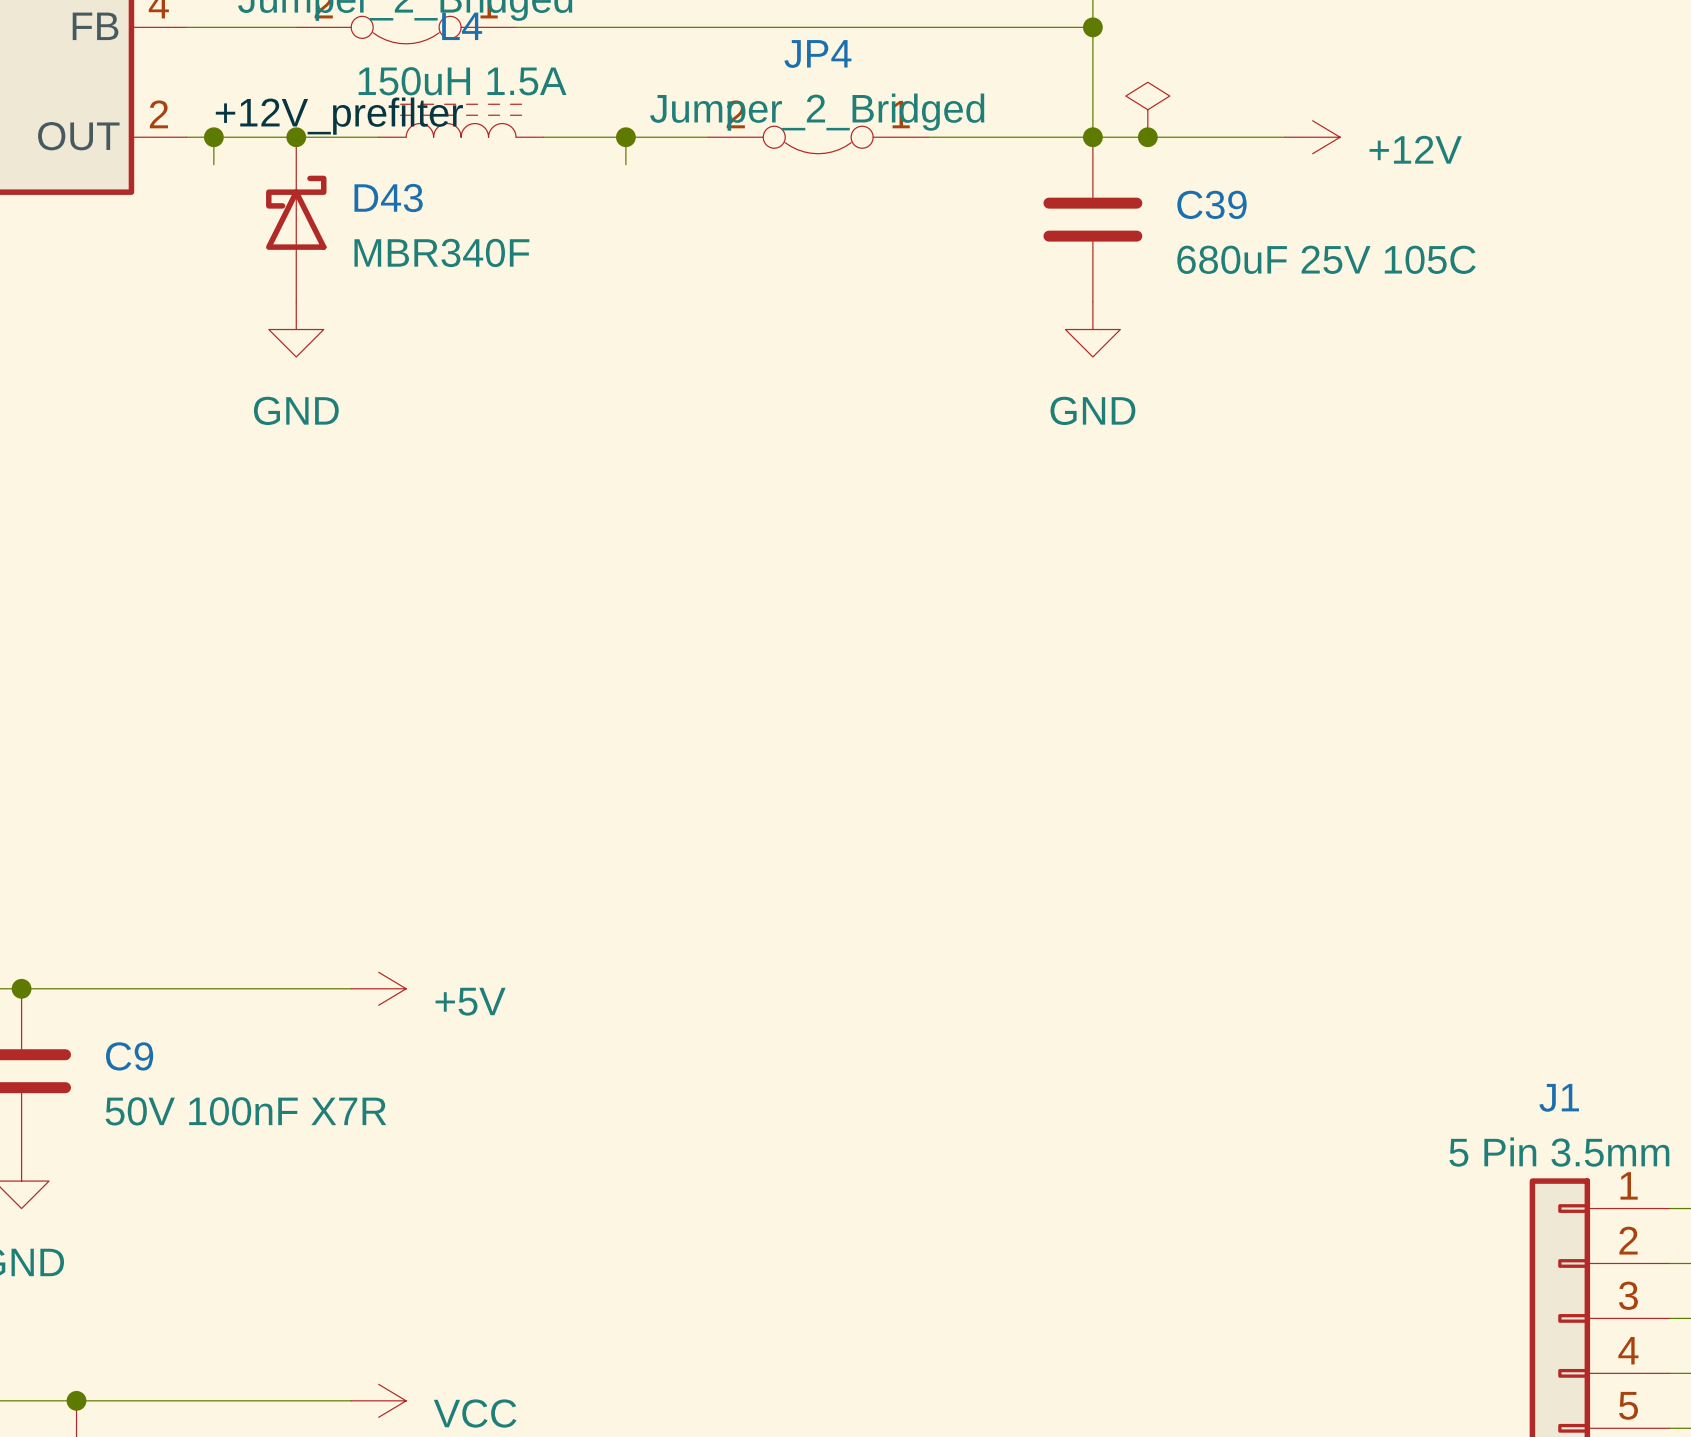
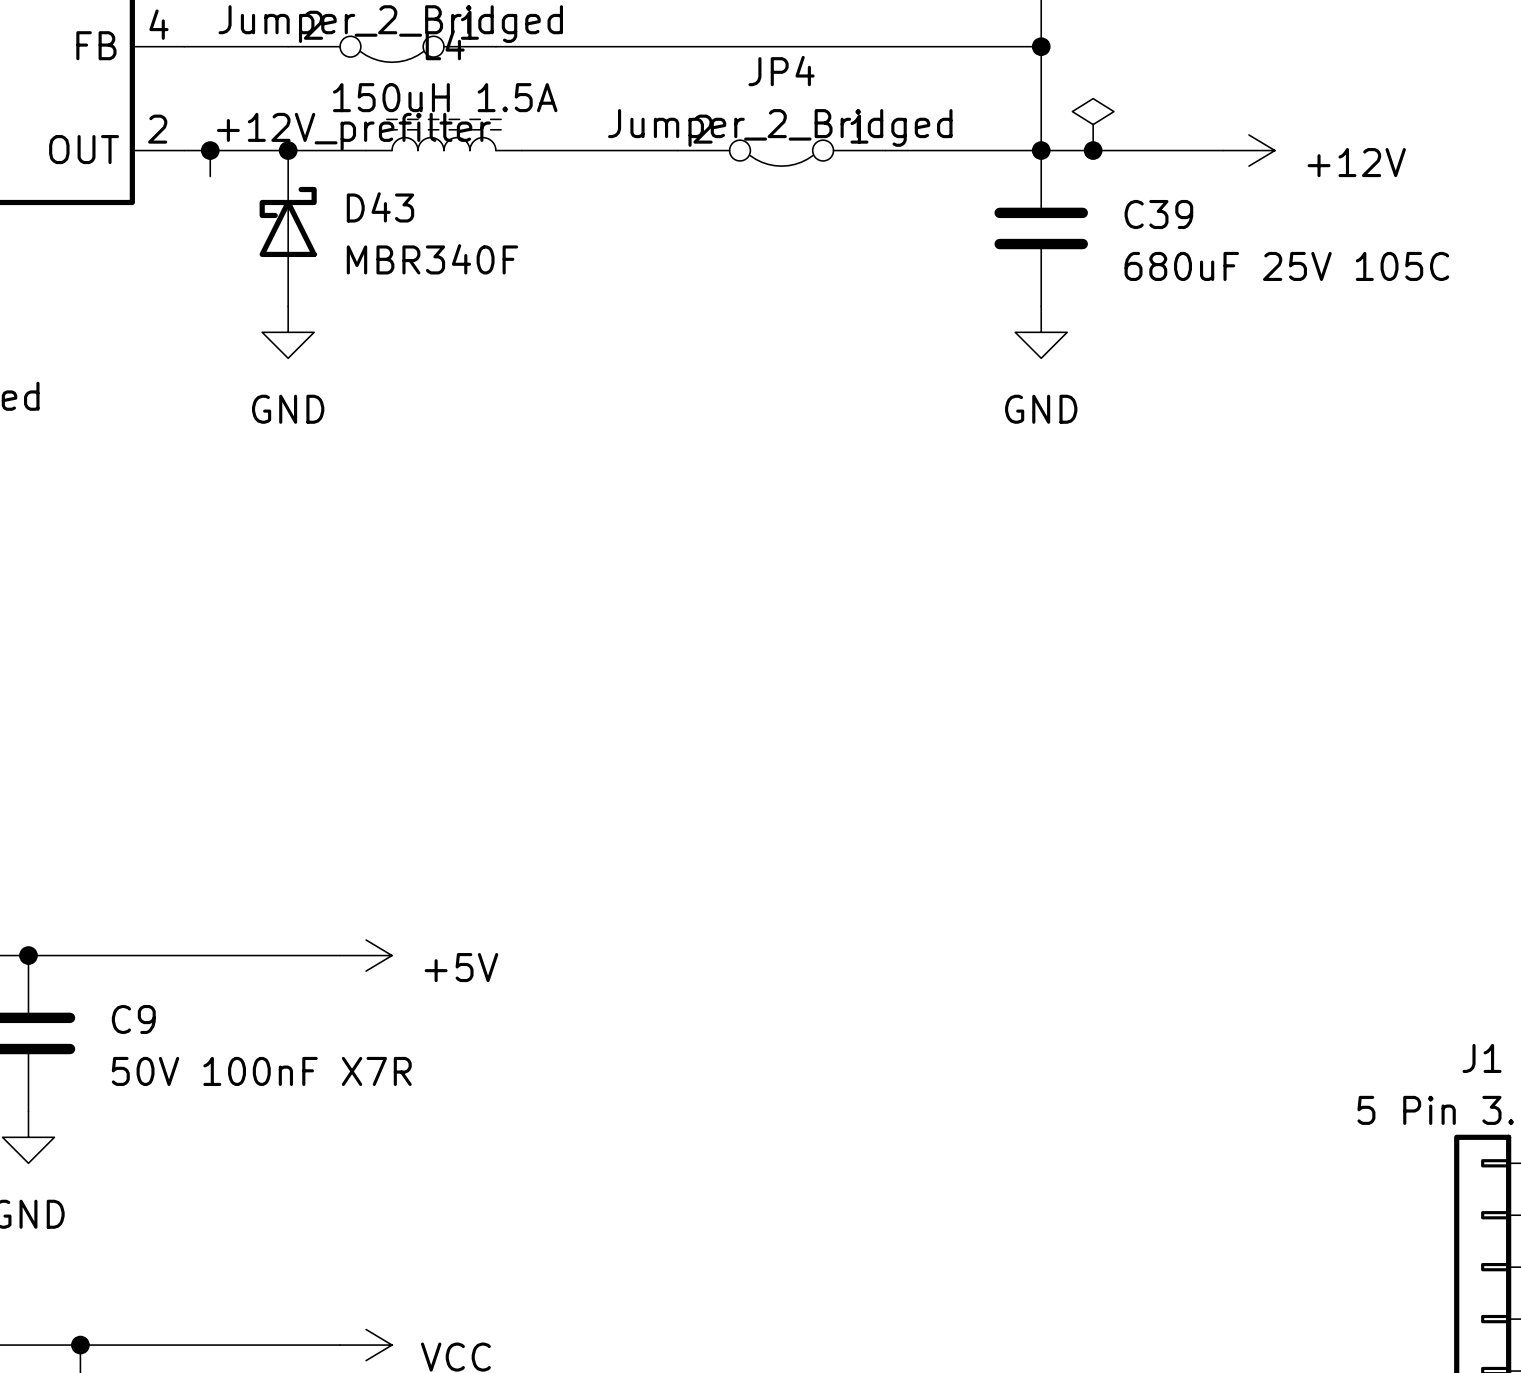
wire: (625, 137) (625, 164) -> none
junction: (625, 137) -> none

